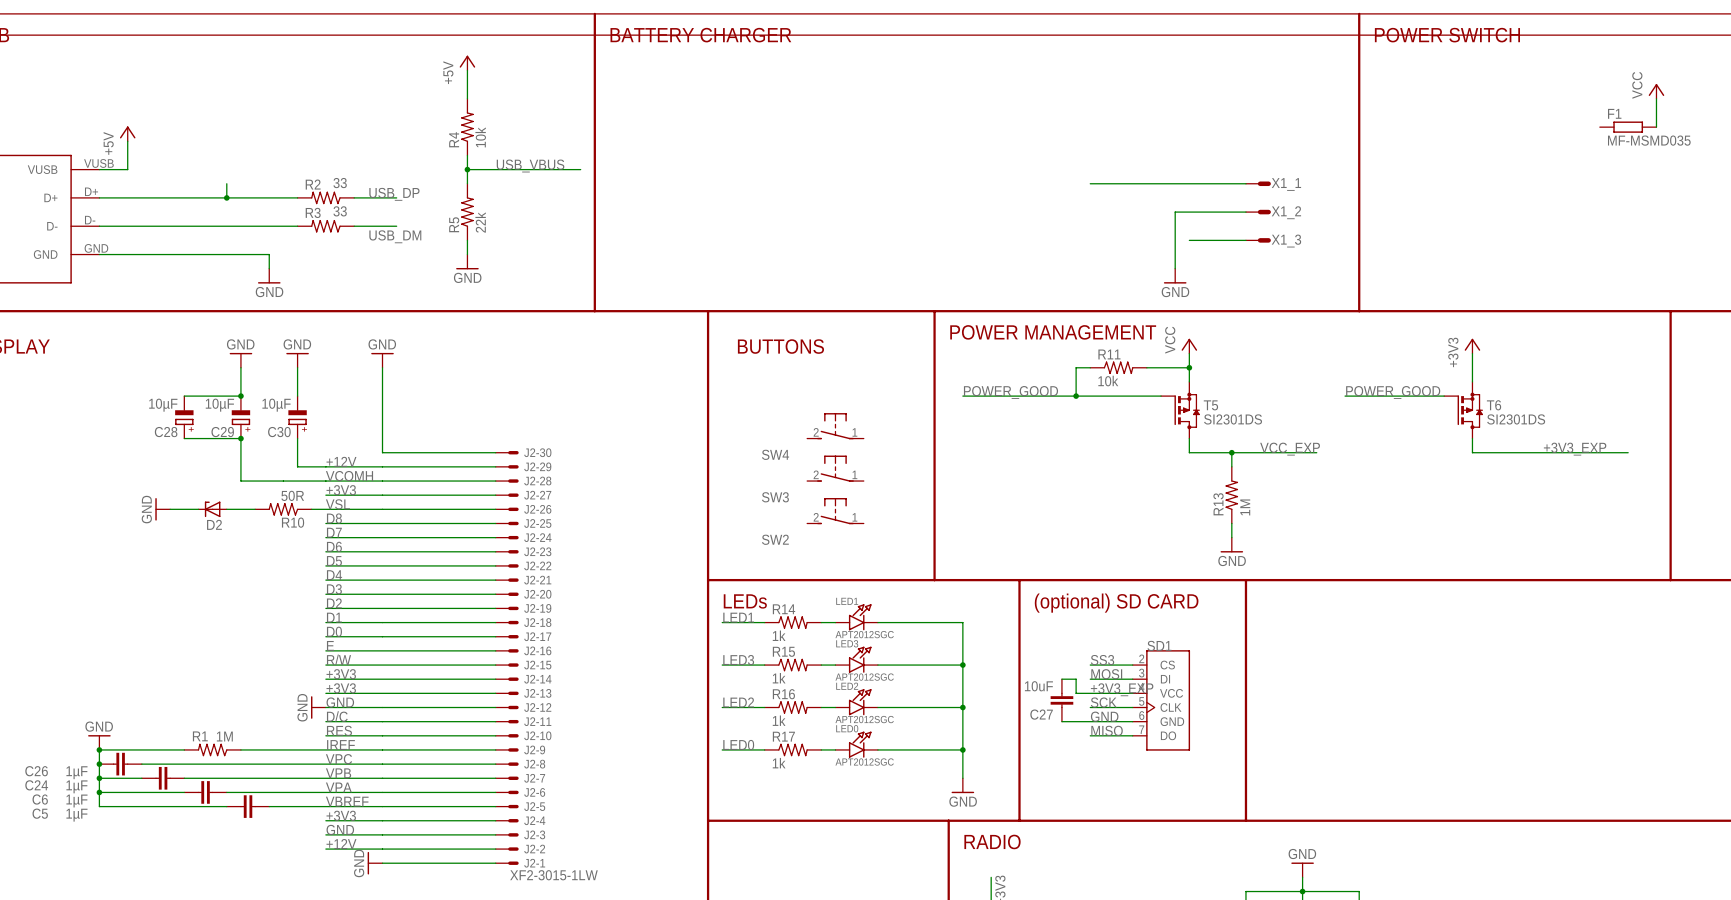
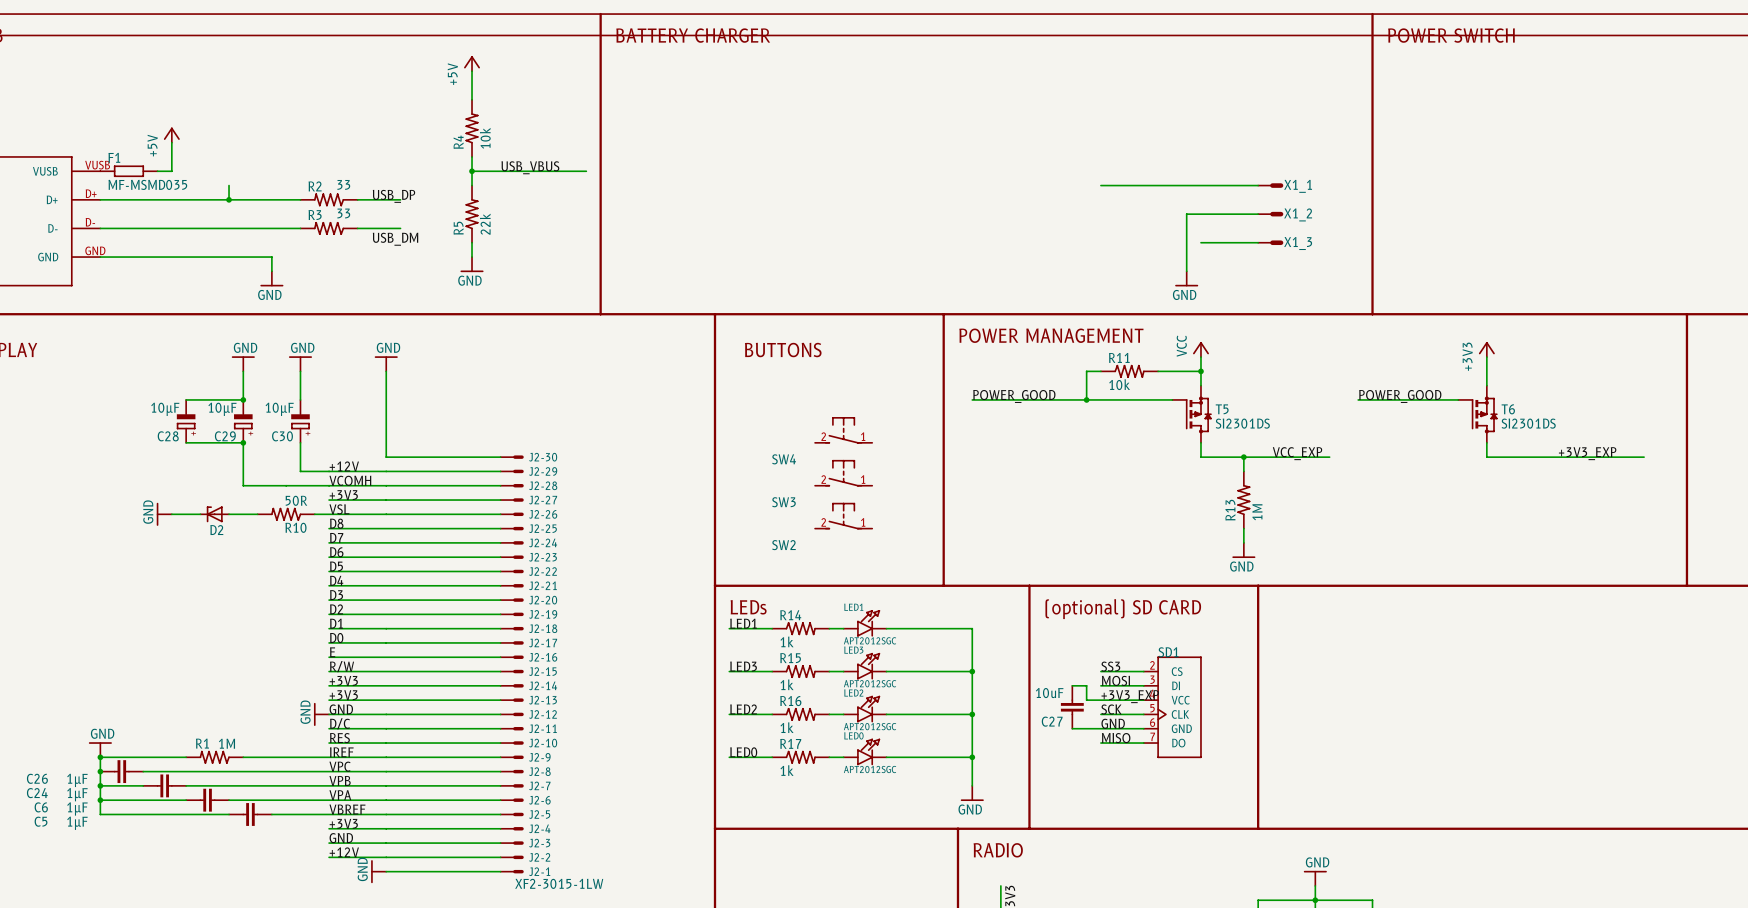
power symbol: VCC (1656, 91) -> none
wire: (1656, 98) (1656, 127) -> none
F1 position: (1628, 127) -> (128, 171)
power symbol position: +5V (127, 133) -> +5V (171, 135)
wire: (127, 141) (127, 169) (99, 169) -> none
wire: none -> (171, 142) (171, 171) (157, 171)

